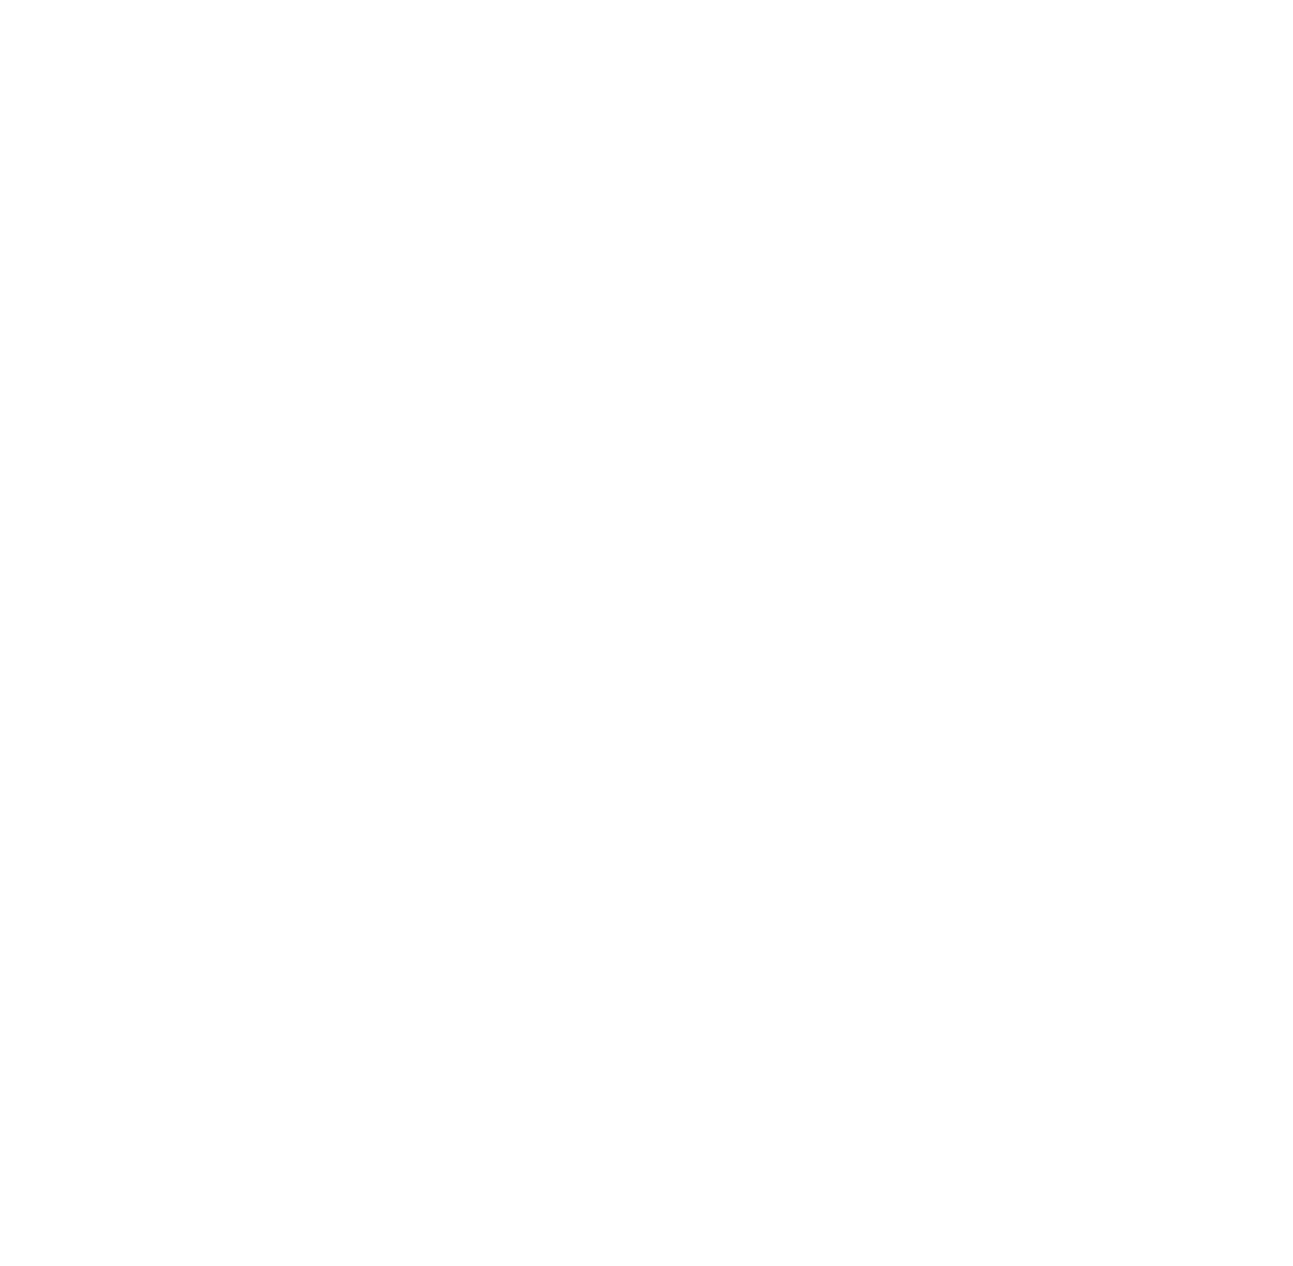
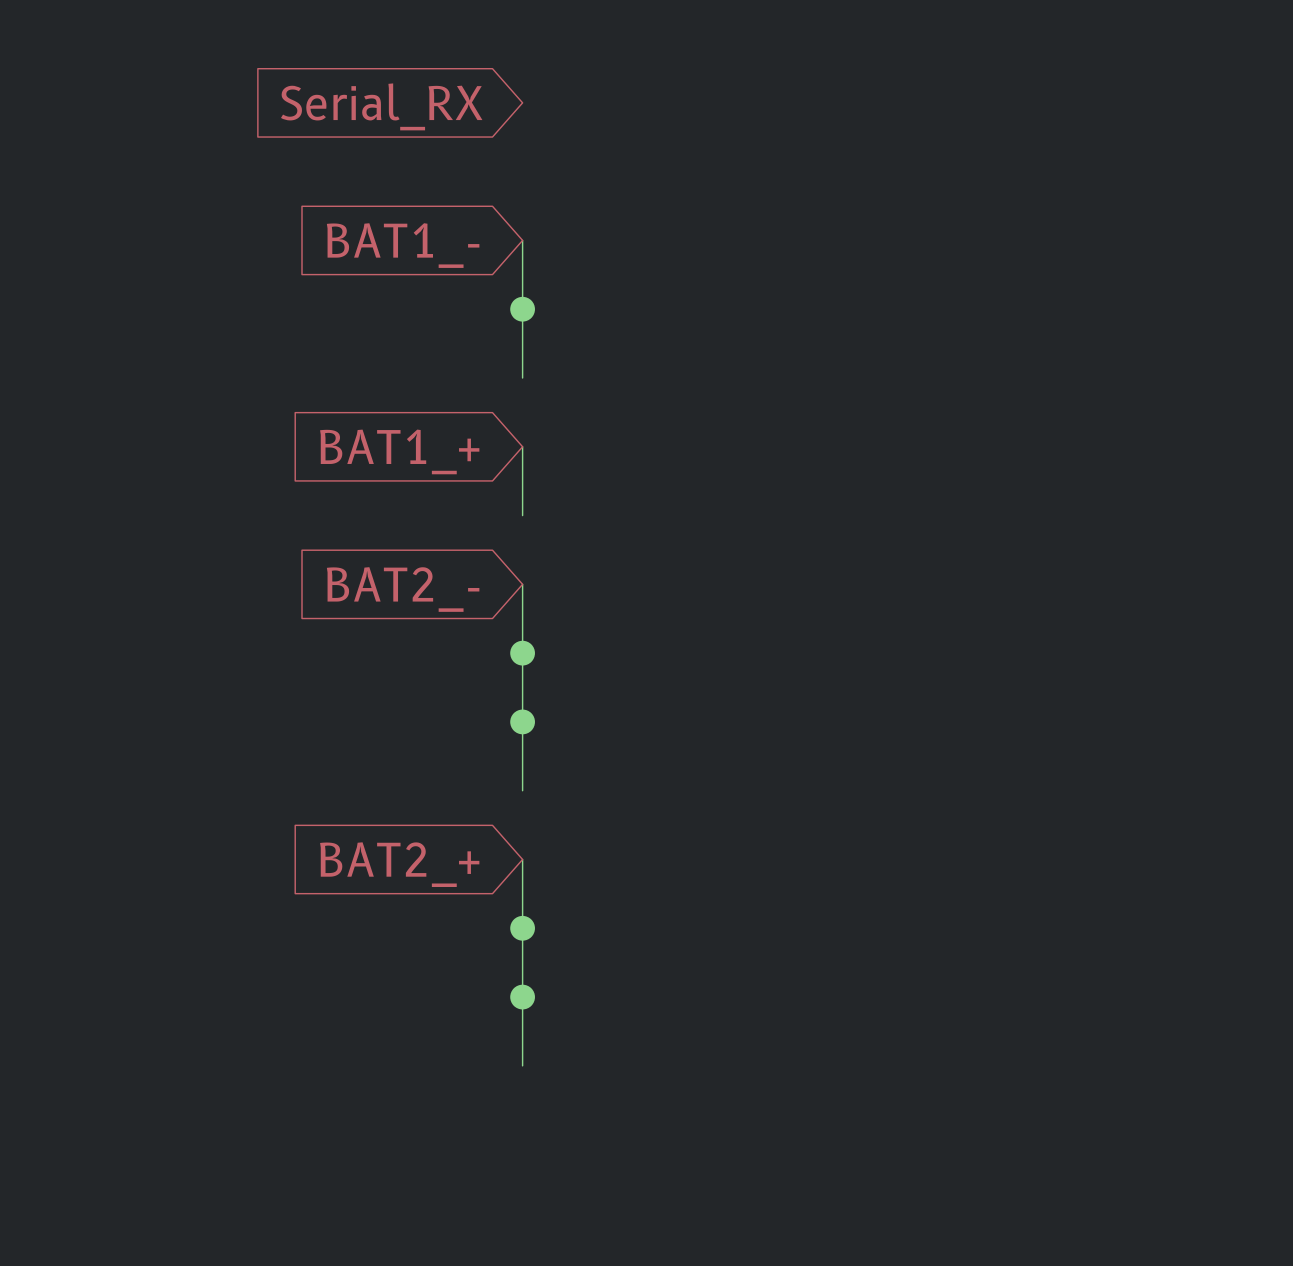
global label: none -> Serial_RX (381, 106)
wire: none -> (522, 240) (522, 378)
global label: none -> BAT1_- (403, 245)
junction: none -> (522, 309)
wire: none -> (522, 446) (522, 515)
global label: none -> BAT1_+ (399, 451)
wire: none -> (522, 584) (522, 790)
global label: none -> BAT2_- (403, 589)
junction: none -> (522, 653)
junction: none -> (522, 721)
wire: none -> (522, 859) (522, 1065)
global label: none -> BAT2_+ (399, 864)
junction: none -> (522, 928)
junction: none -> (522, 997)

